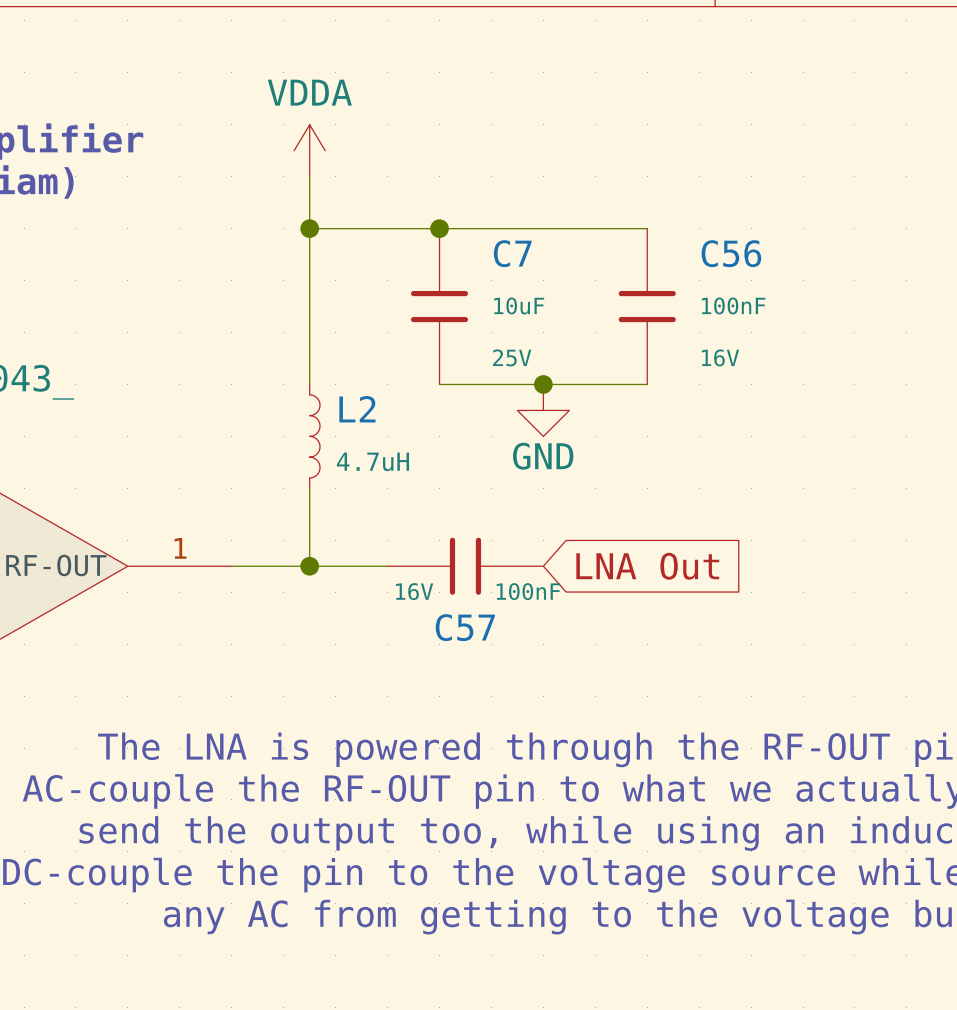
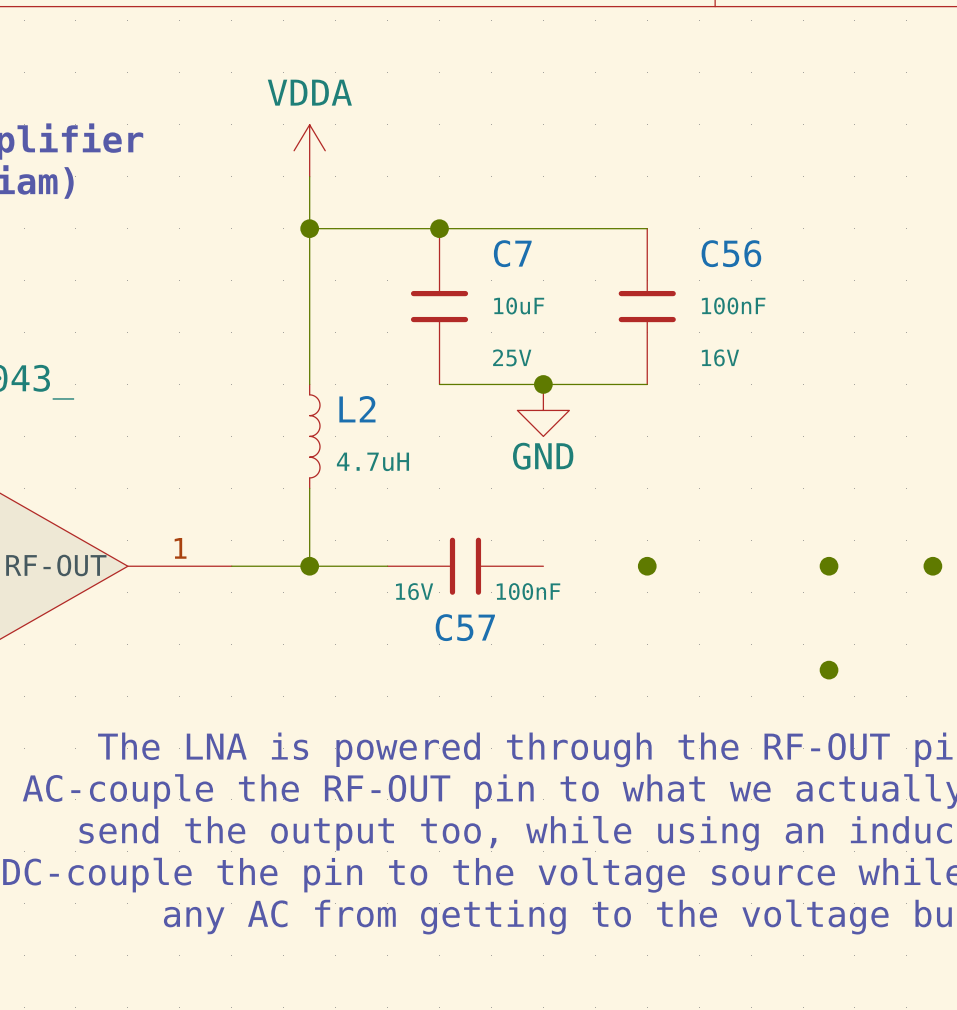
junction: none -> (647, 566)
global label: LNA Out (647, 566) -> none
junction: none -> (829, 566)
junction: none -> (932, 566)
junction: none -> (829, 670)

